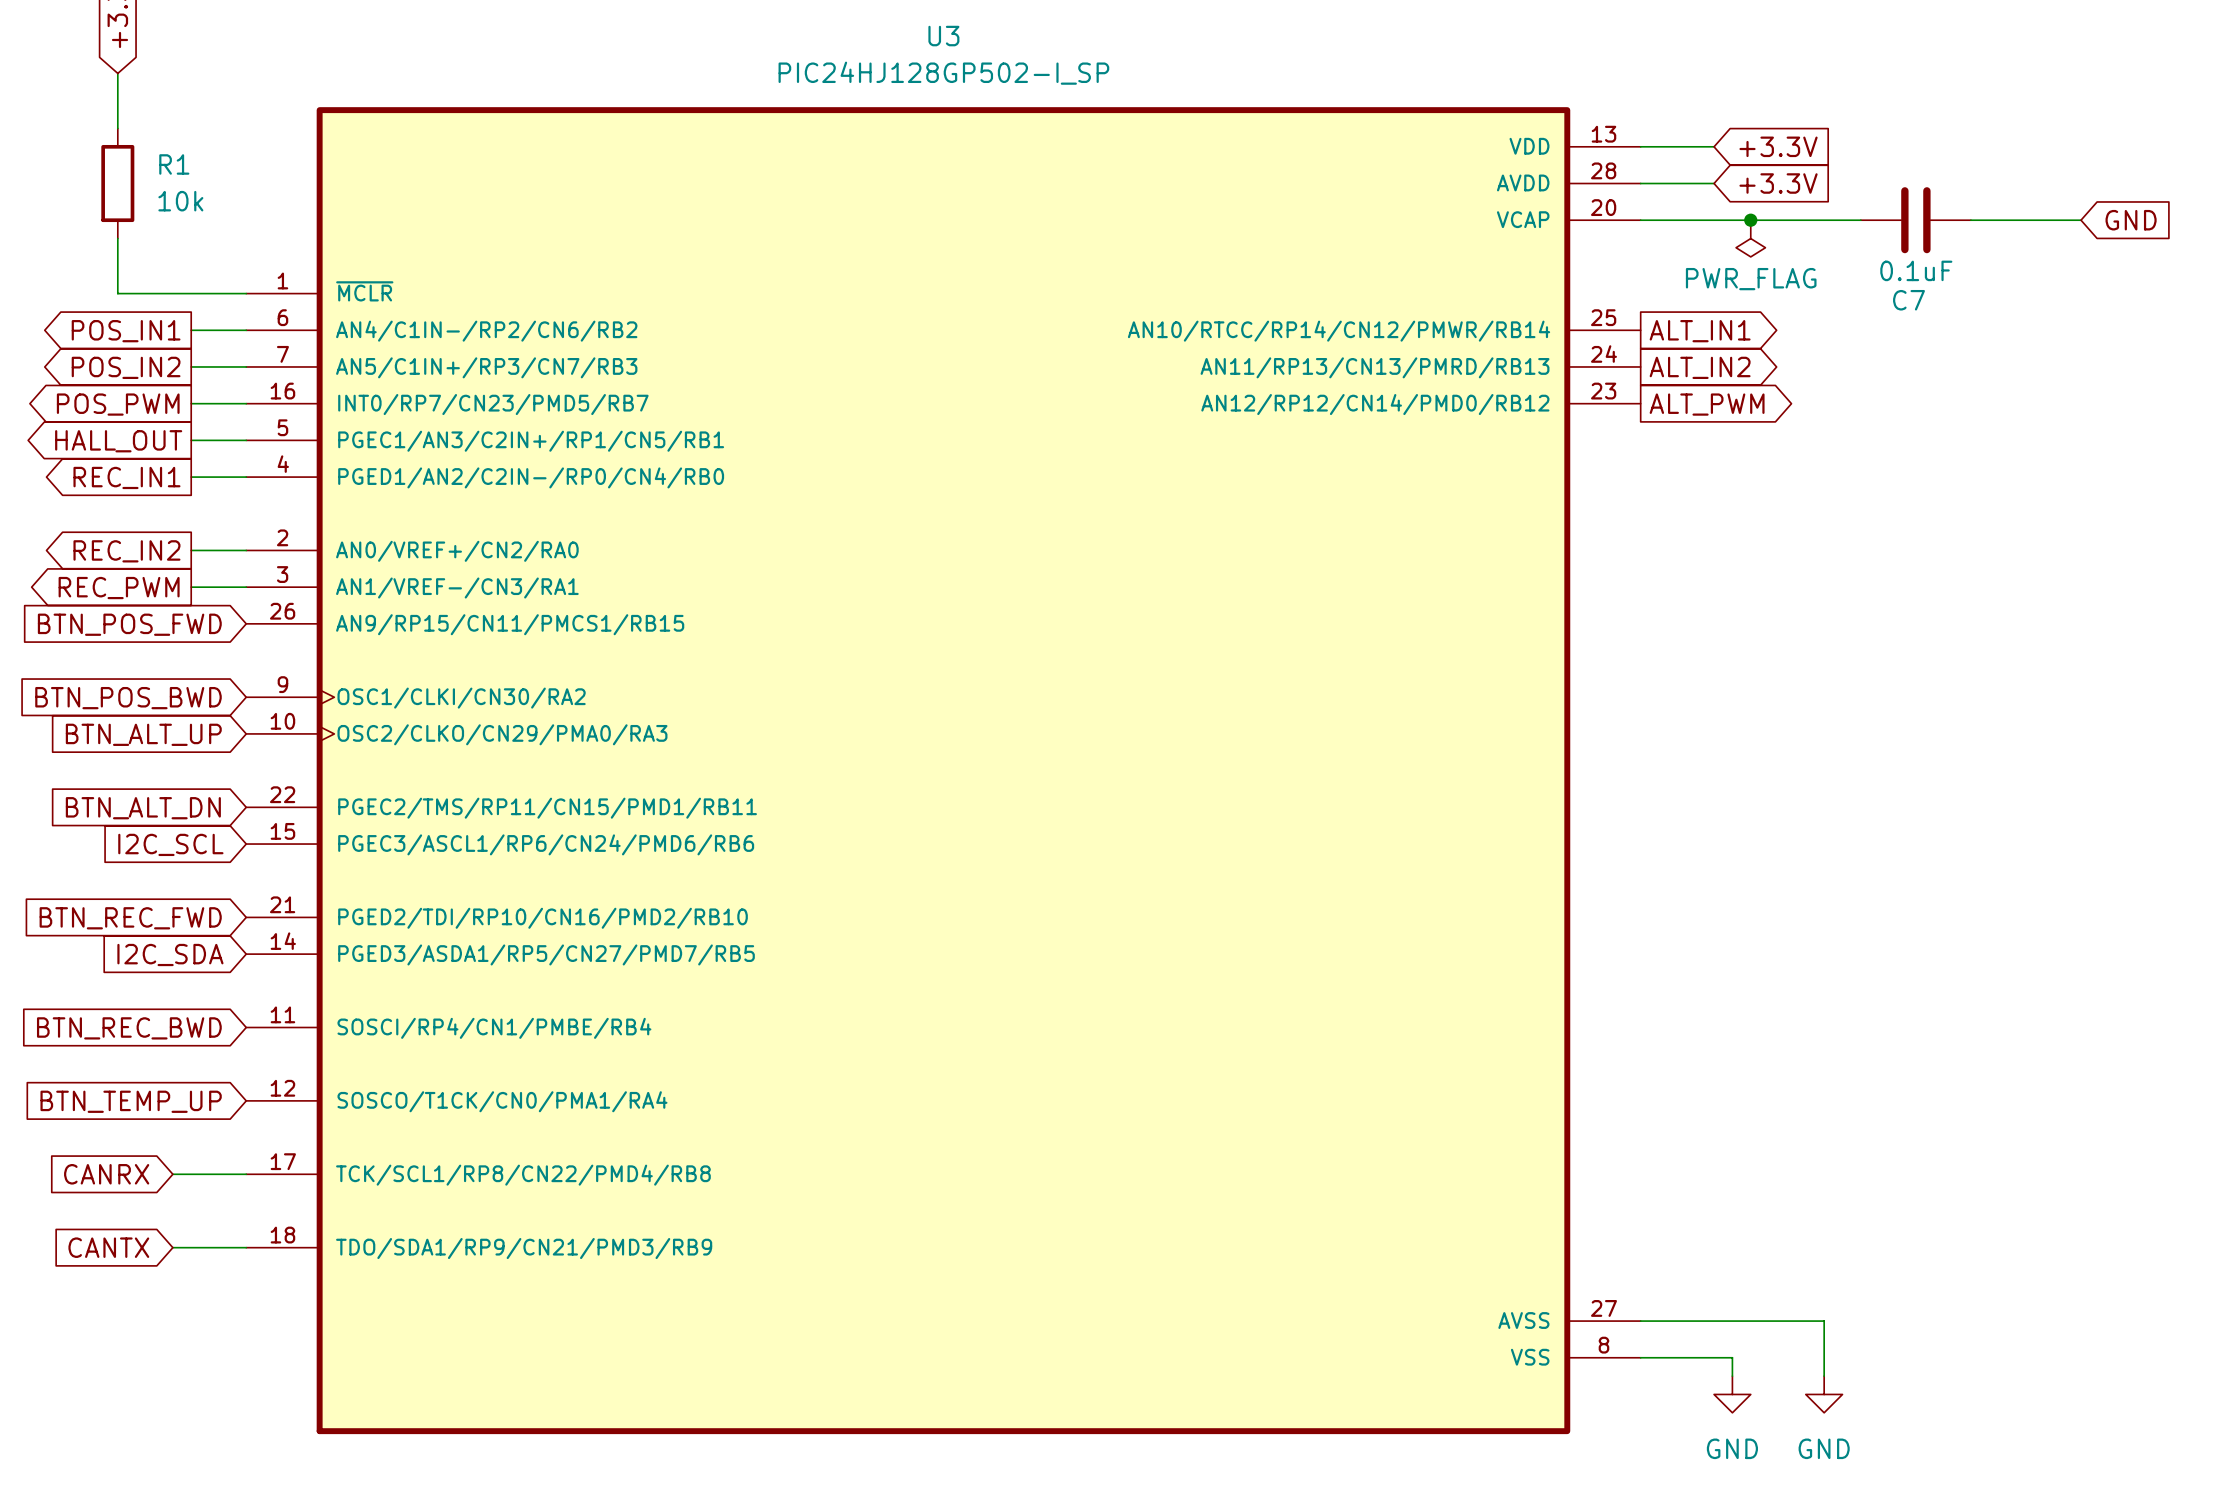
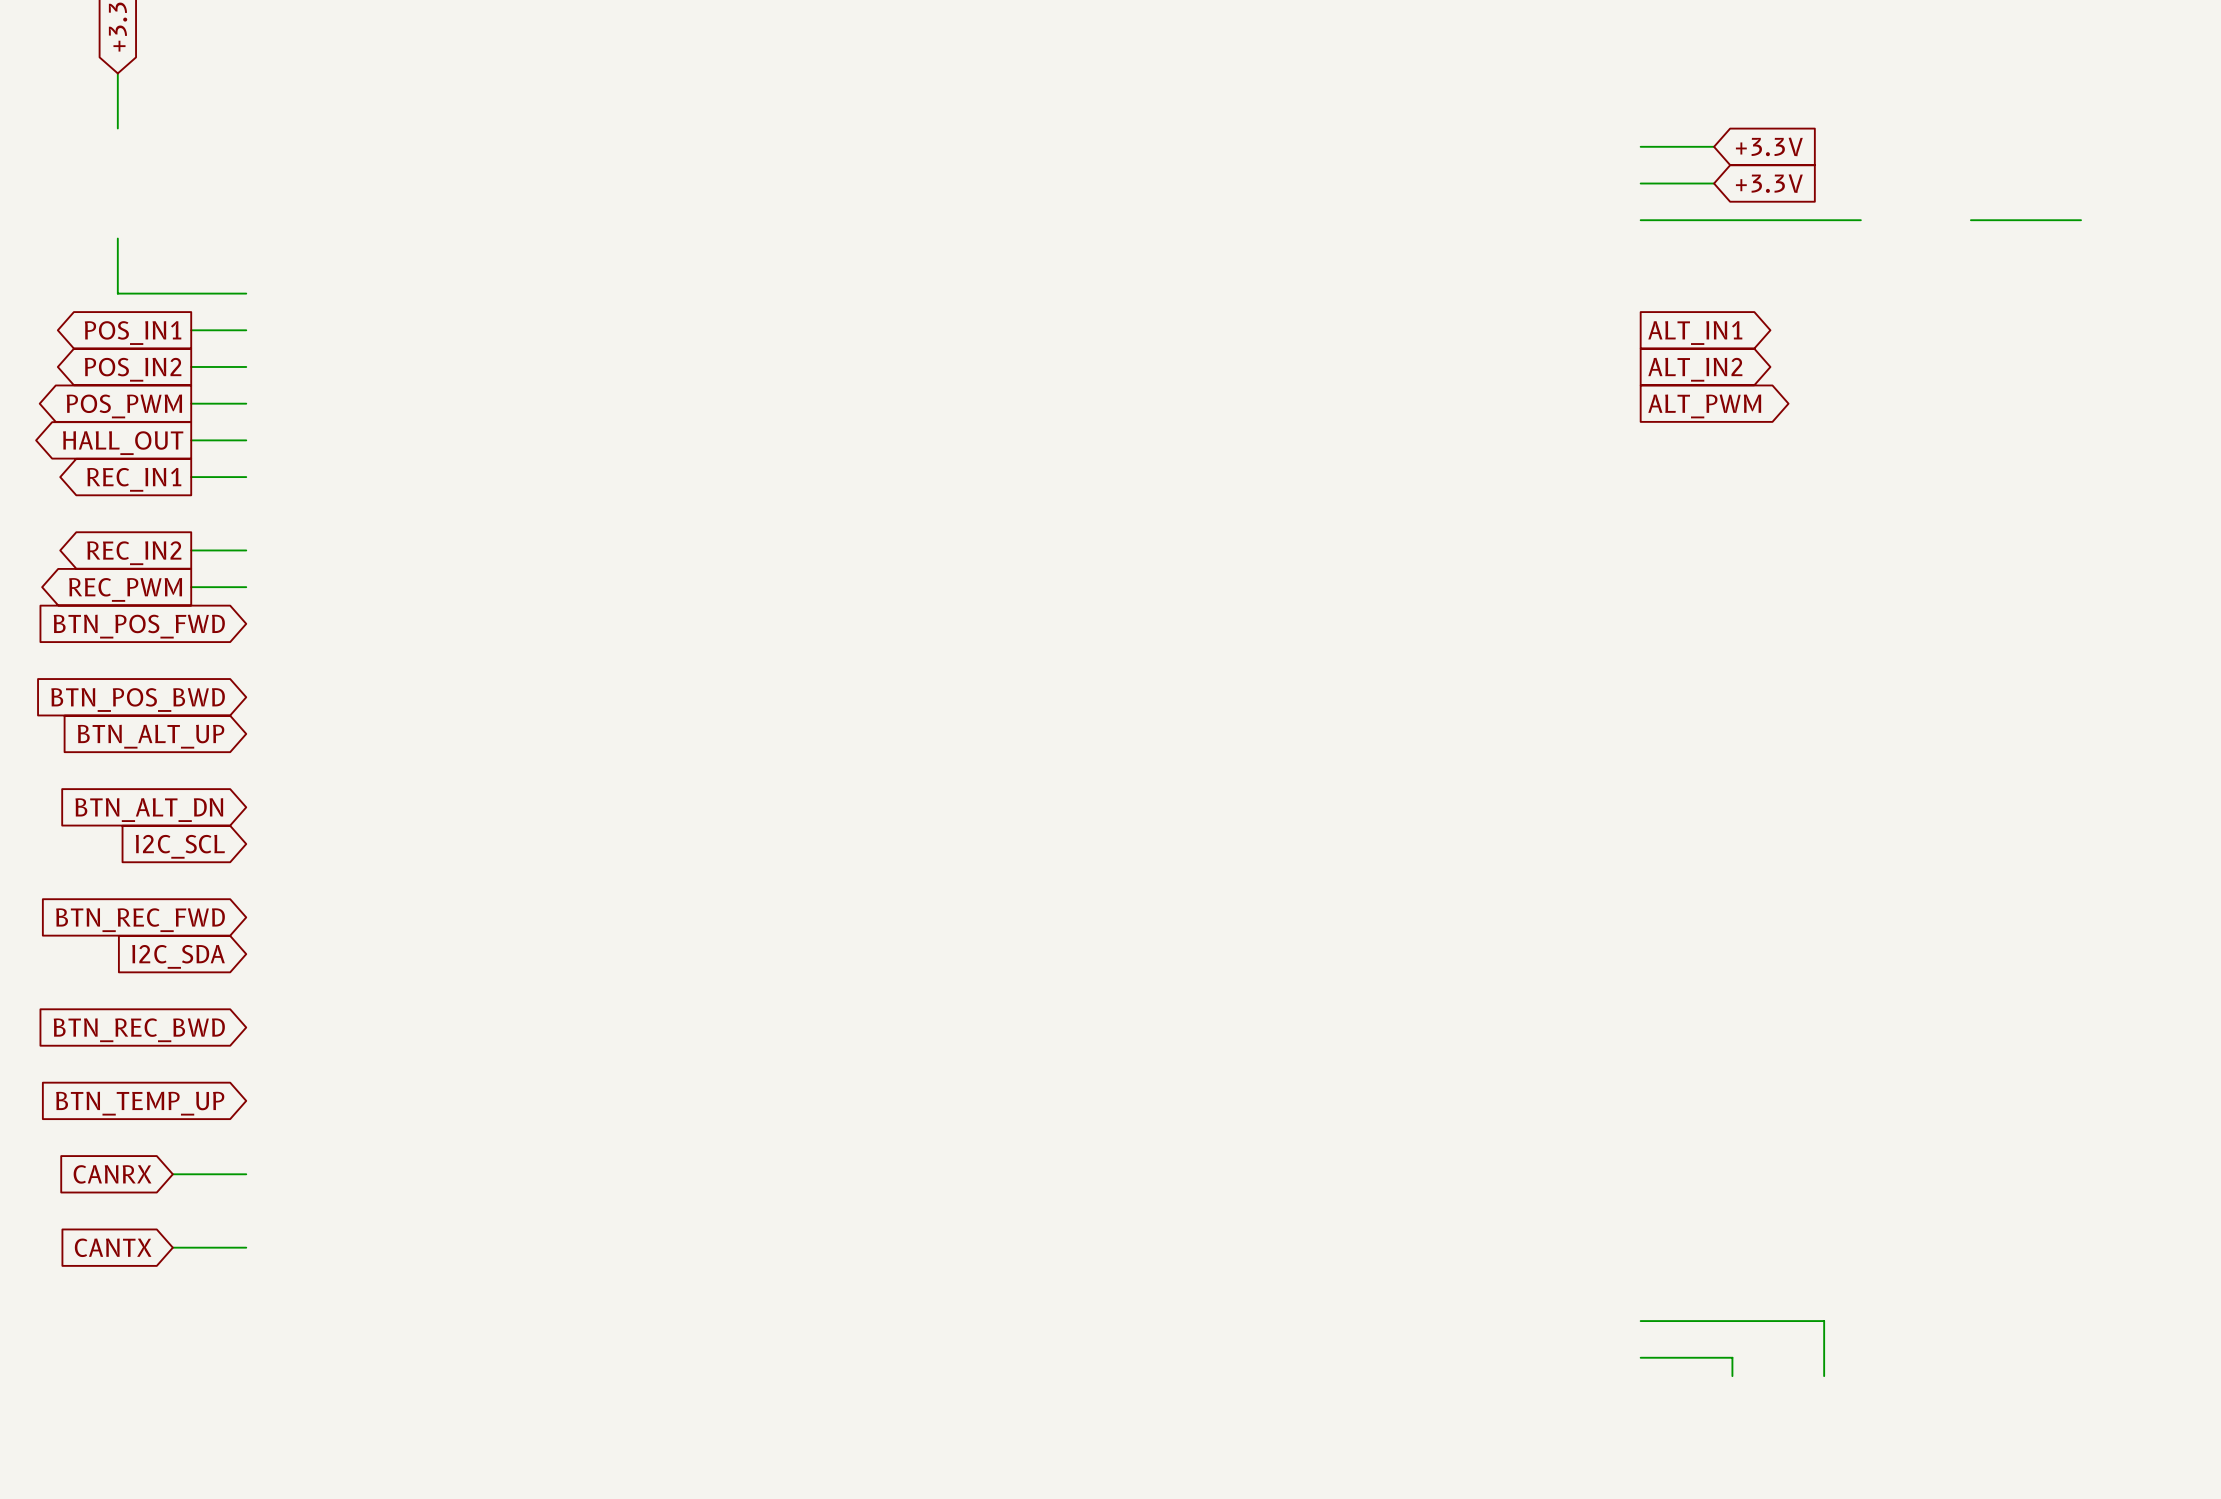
R1: 10k (117, 183) -> none
junction: (1750, 220) -> none
C7: 0.1uF (1915, 220) -> none
global label: GND (2131, 220) -> none
power symbol: PWR_FLAG (1750, 238) -> none
U3: PIC24HJ128GP502-I_SP (943, 770) -> none
power symbol: GND (1732, 1394) -> none
power symbol: GND (1824, 1394) -> none

